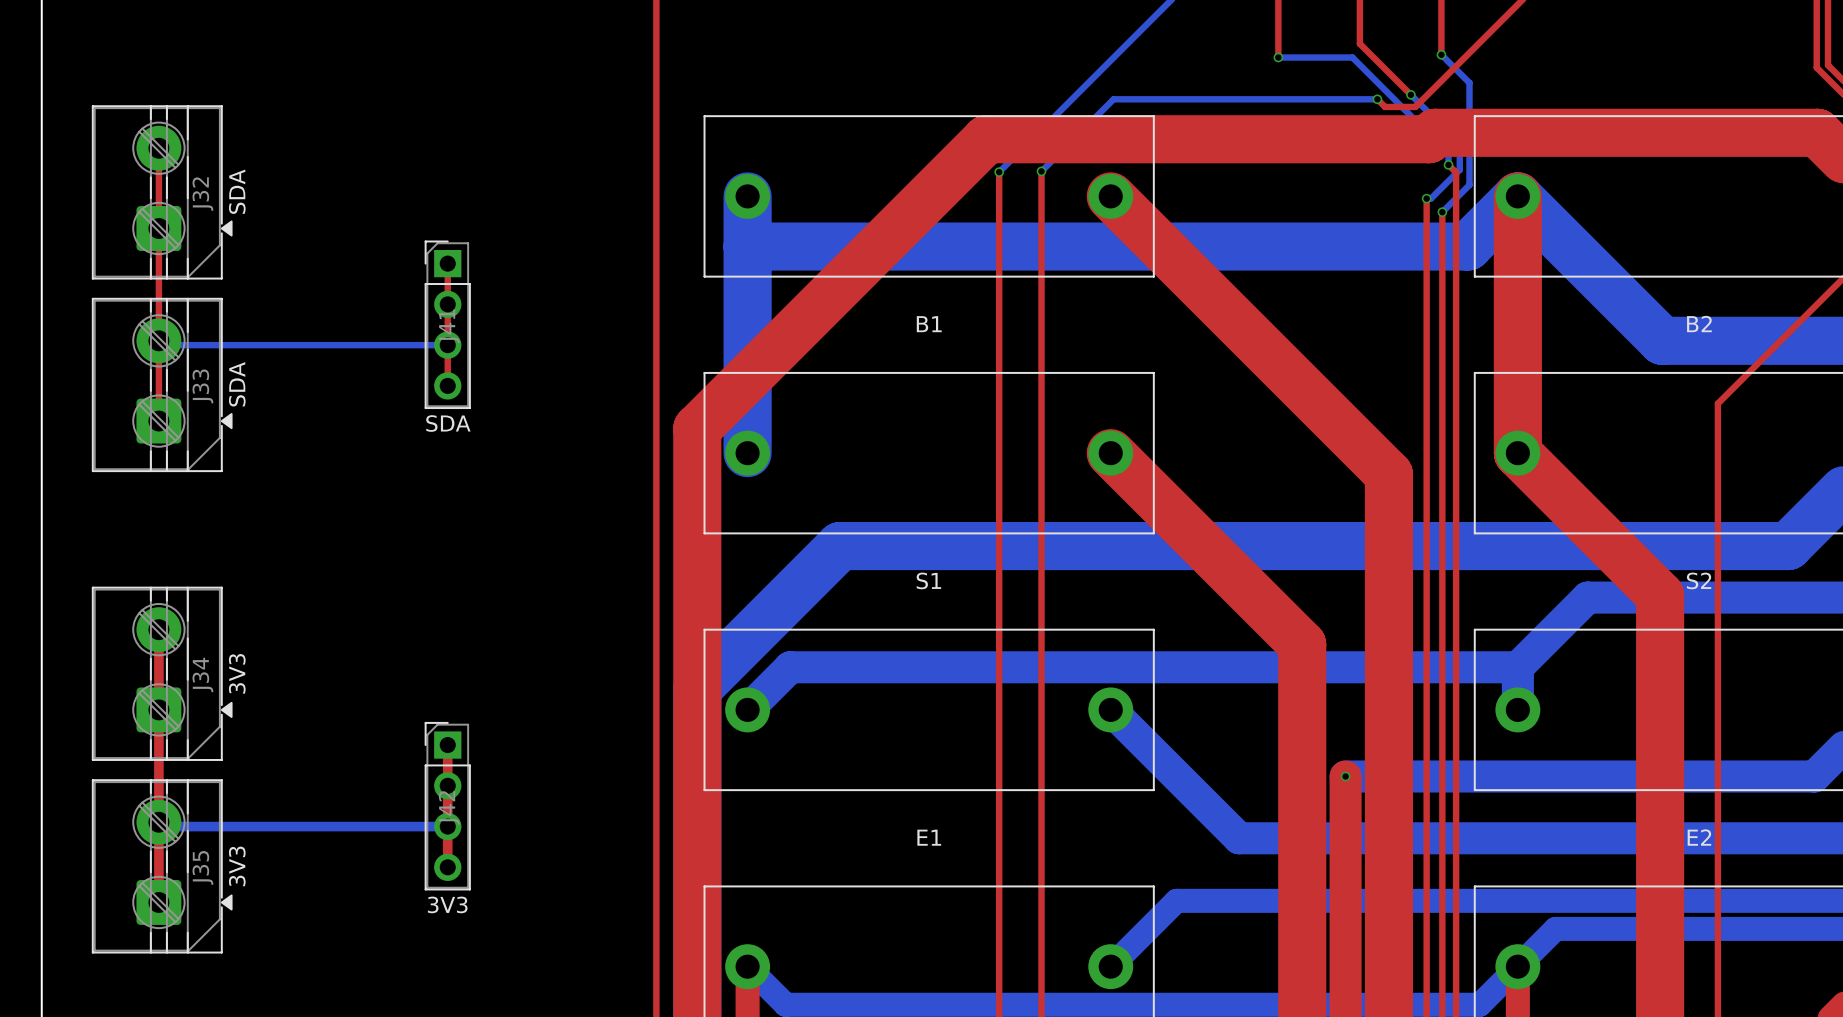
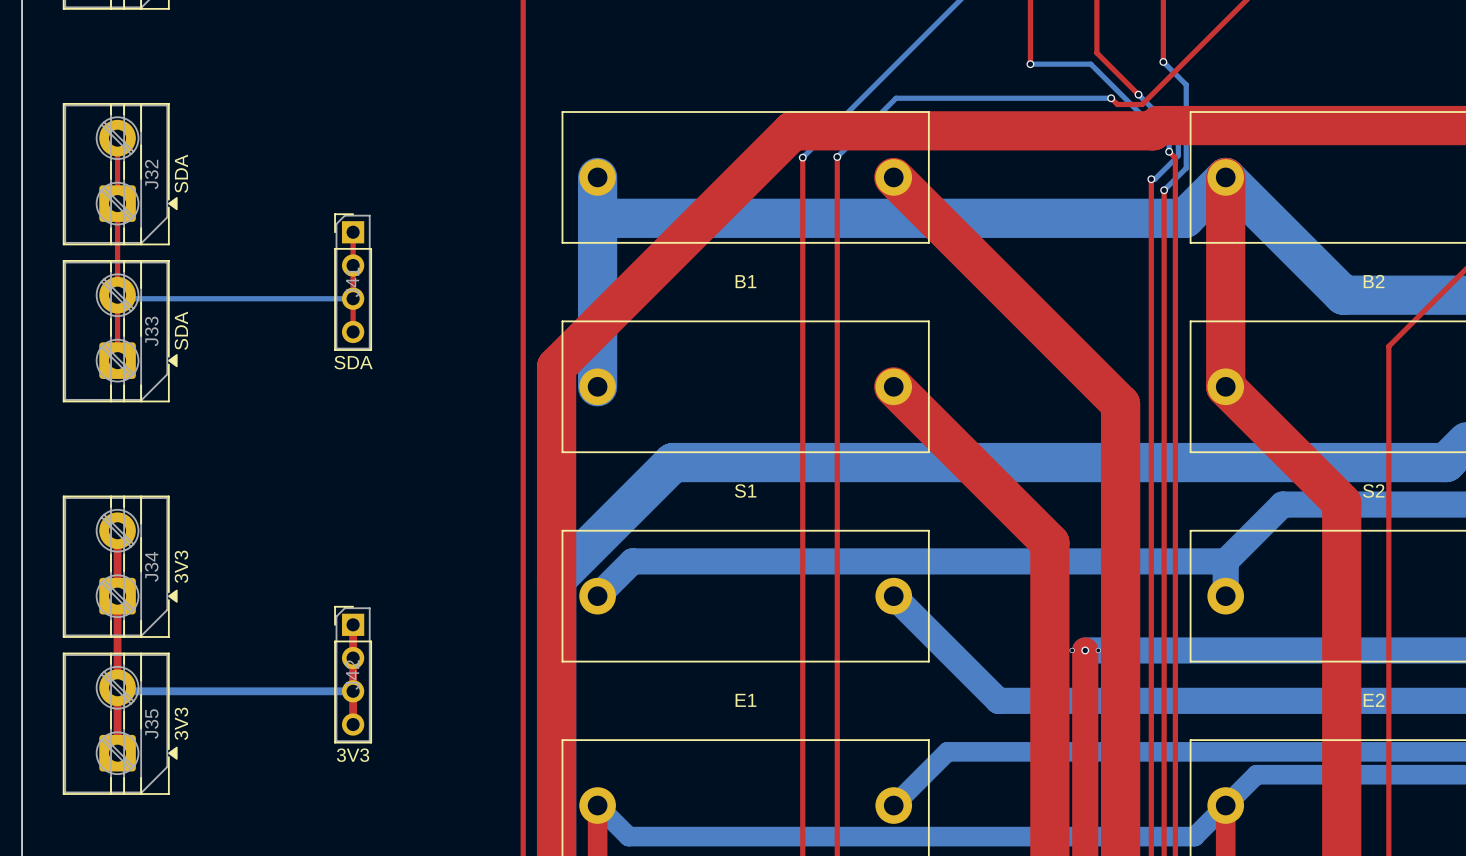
via: none -> (1072, 650)
via: none -> (1098, 650)

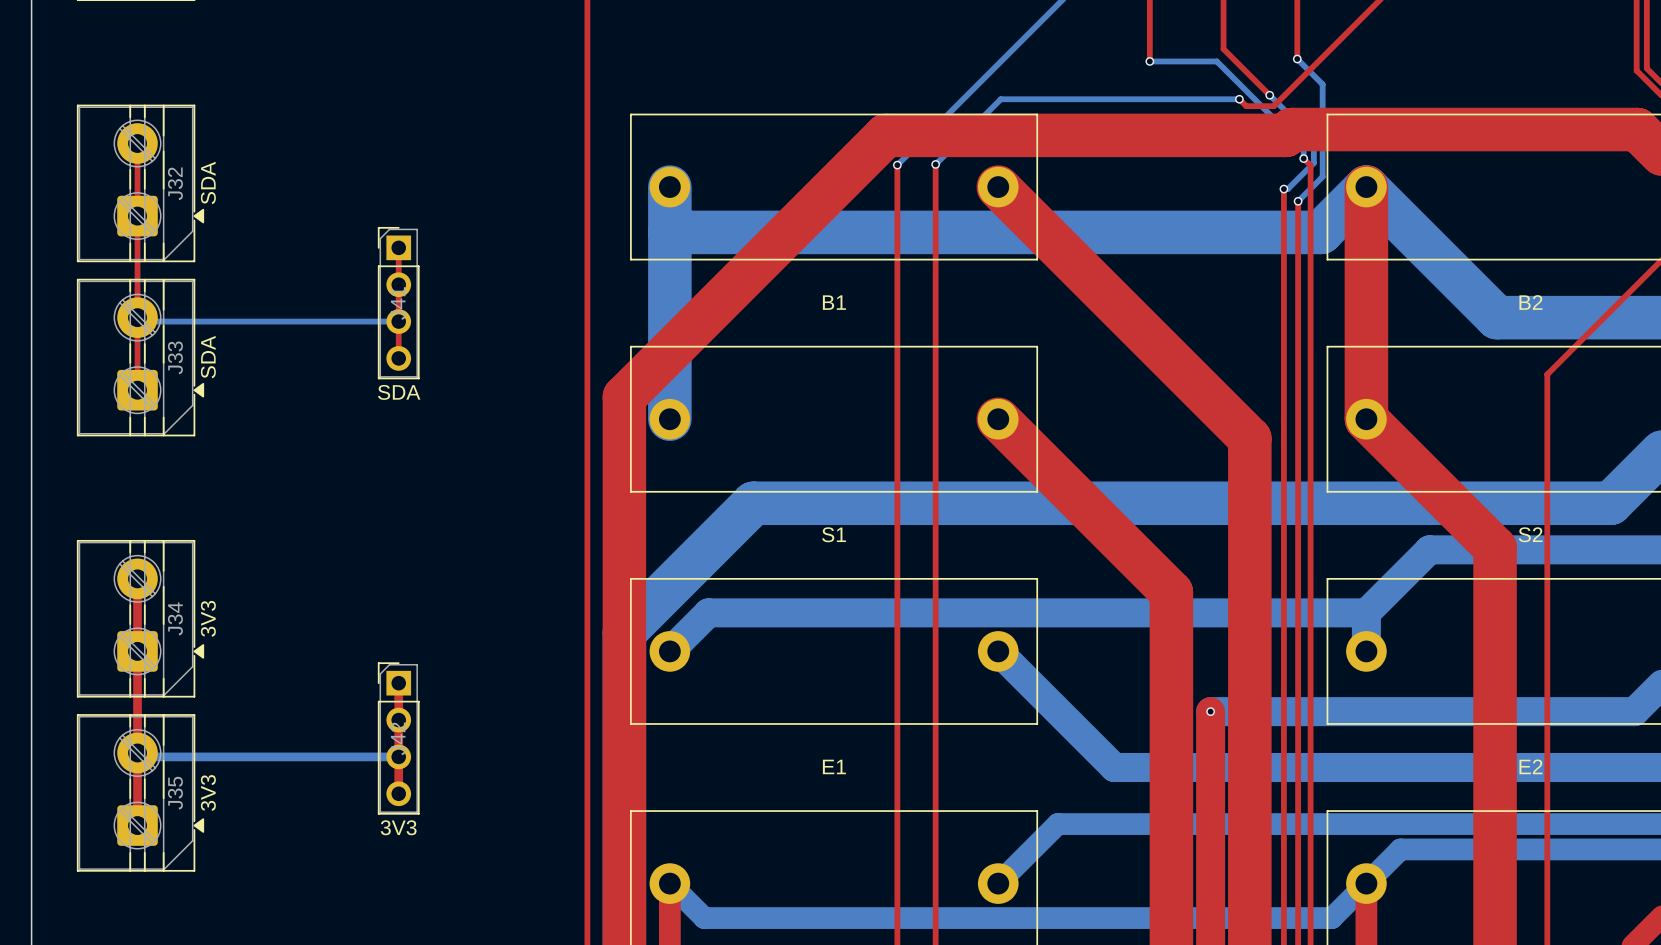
via: (1072, 650) -> none
via: (1098, 650) -> none

